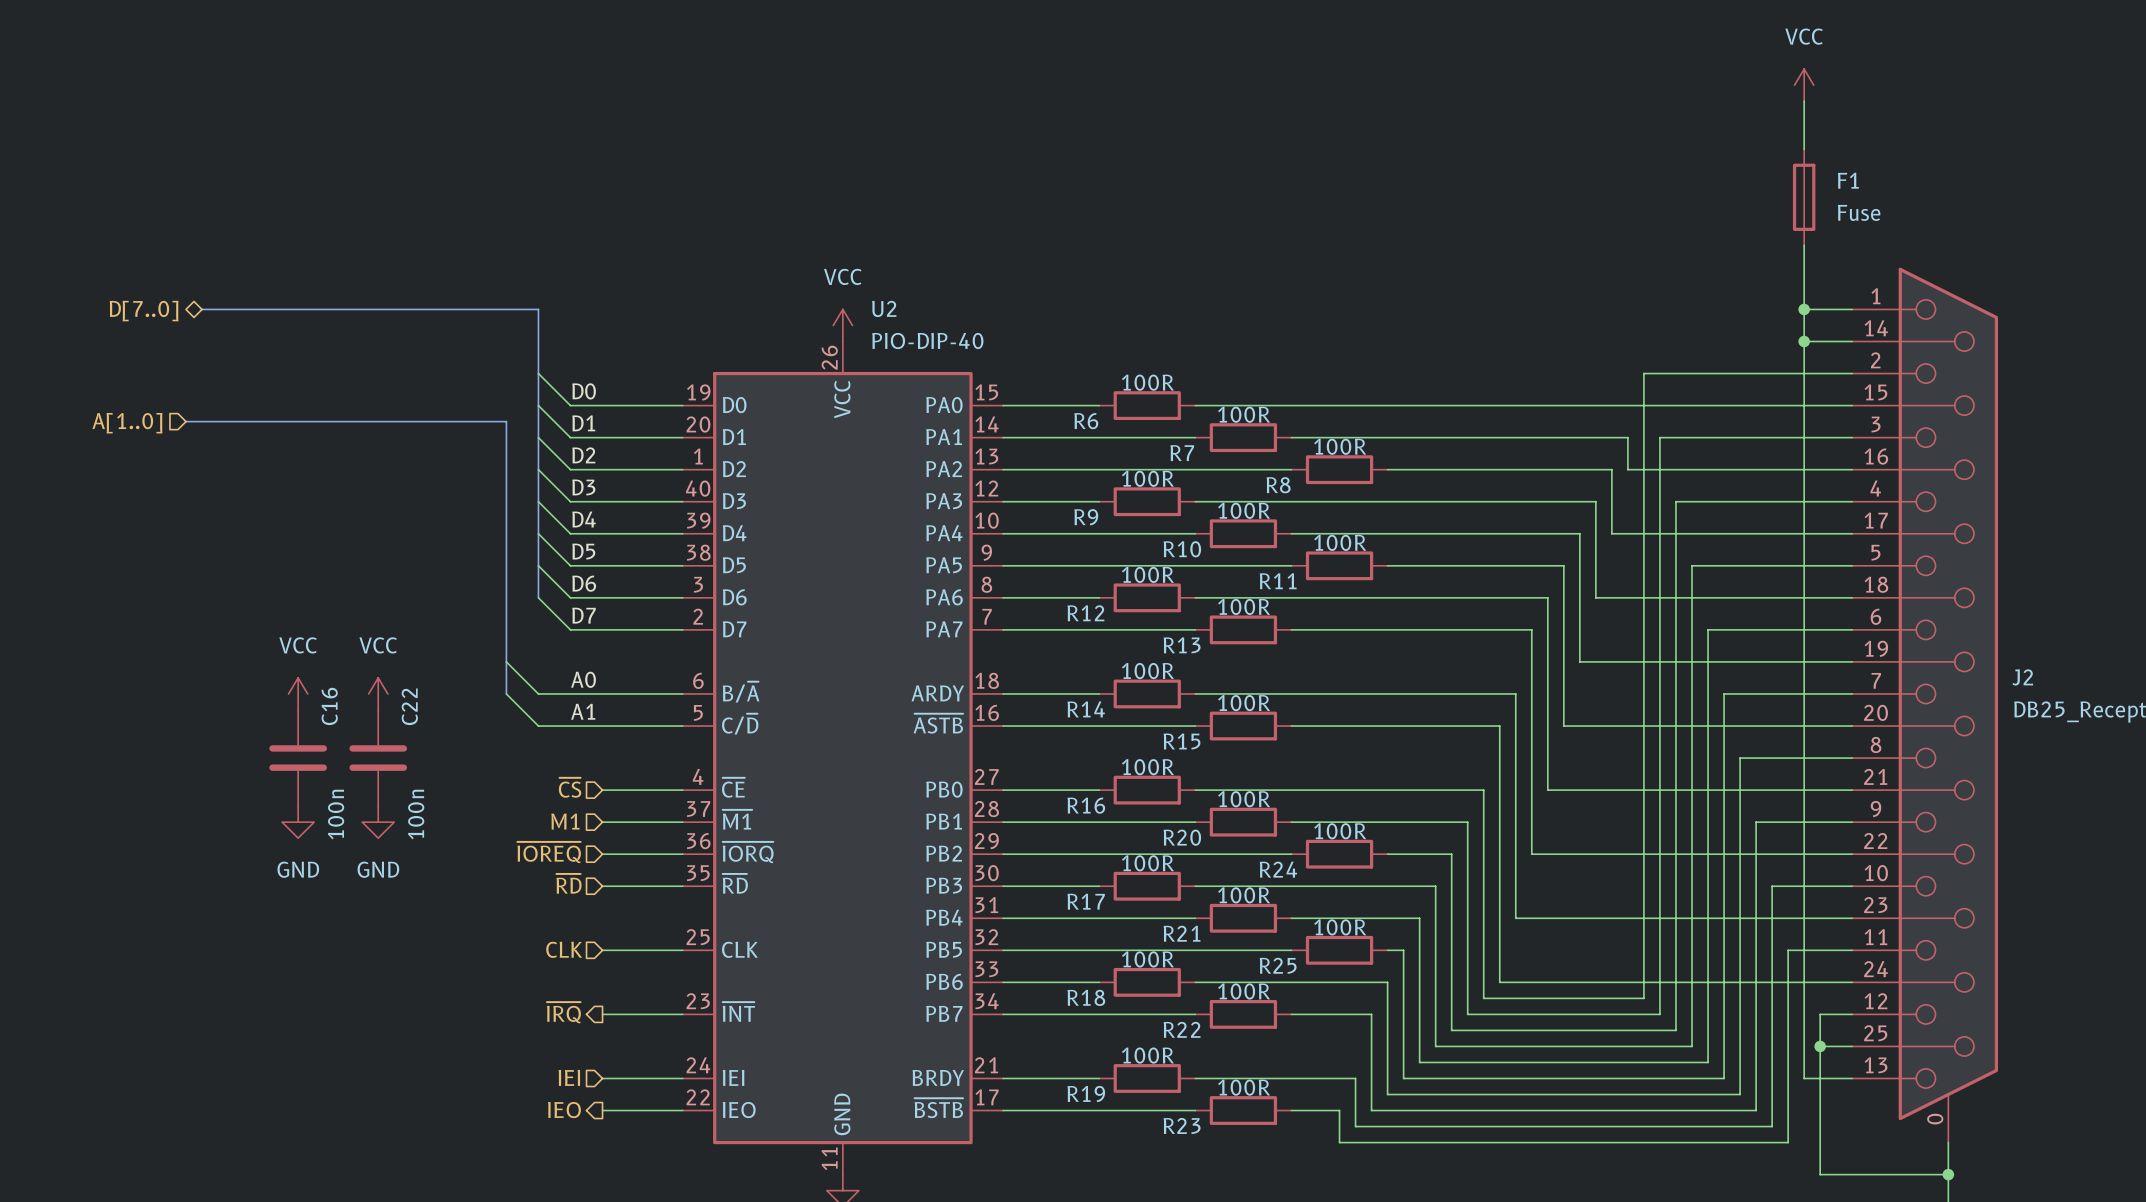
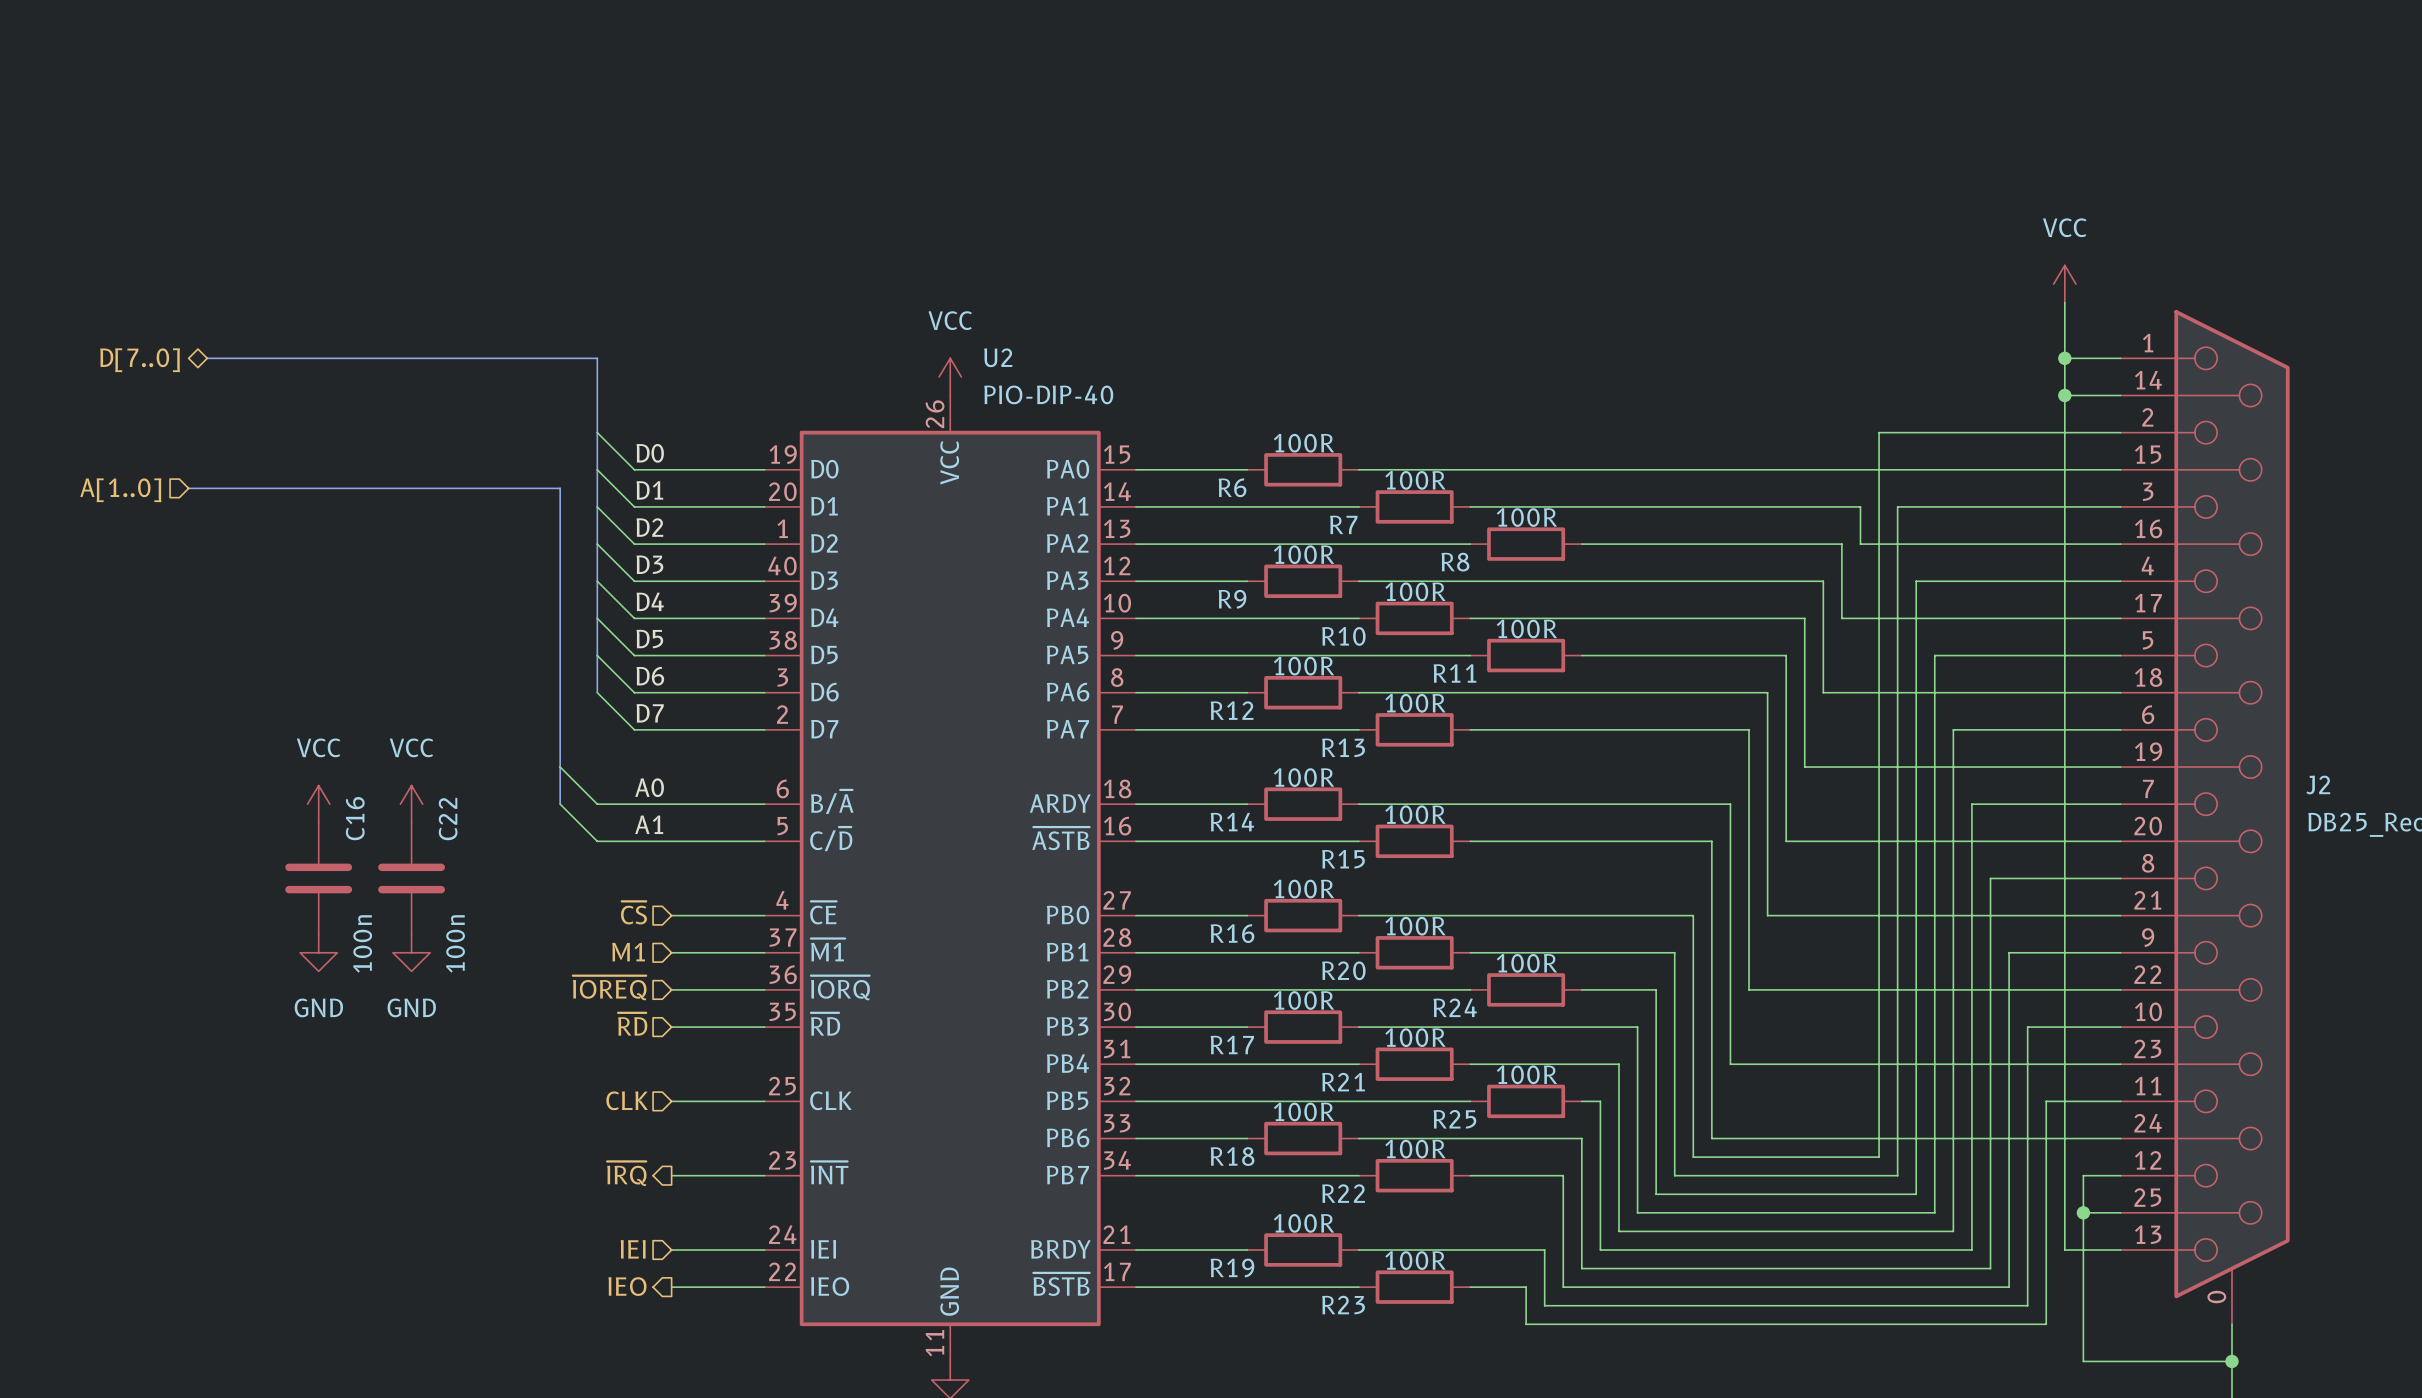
power symbol position: VCC (1804, 85) -> VCC (2064, 284)
wire: (1804, 101) (1804, 149) -> none
F1: Fuse (1804, 197) -> none

